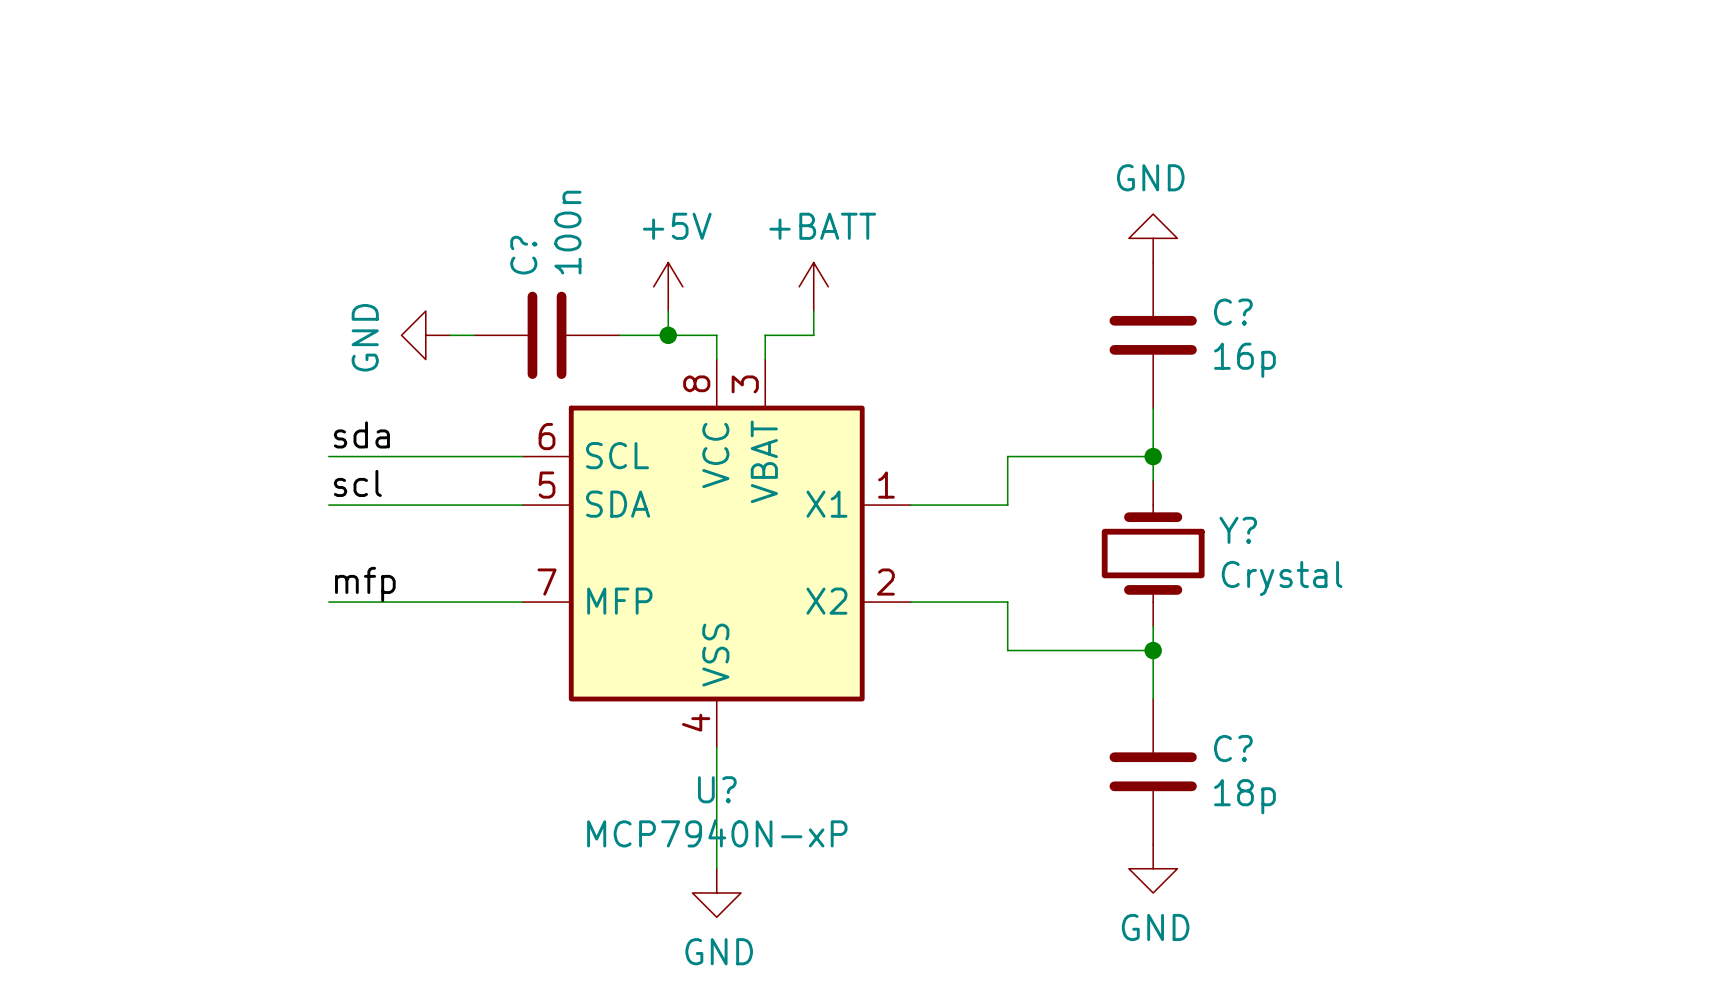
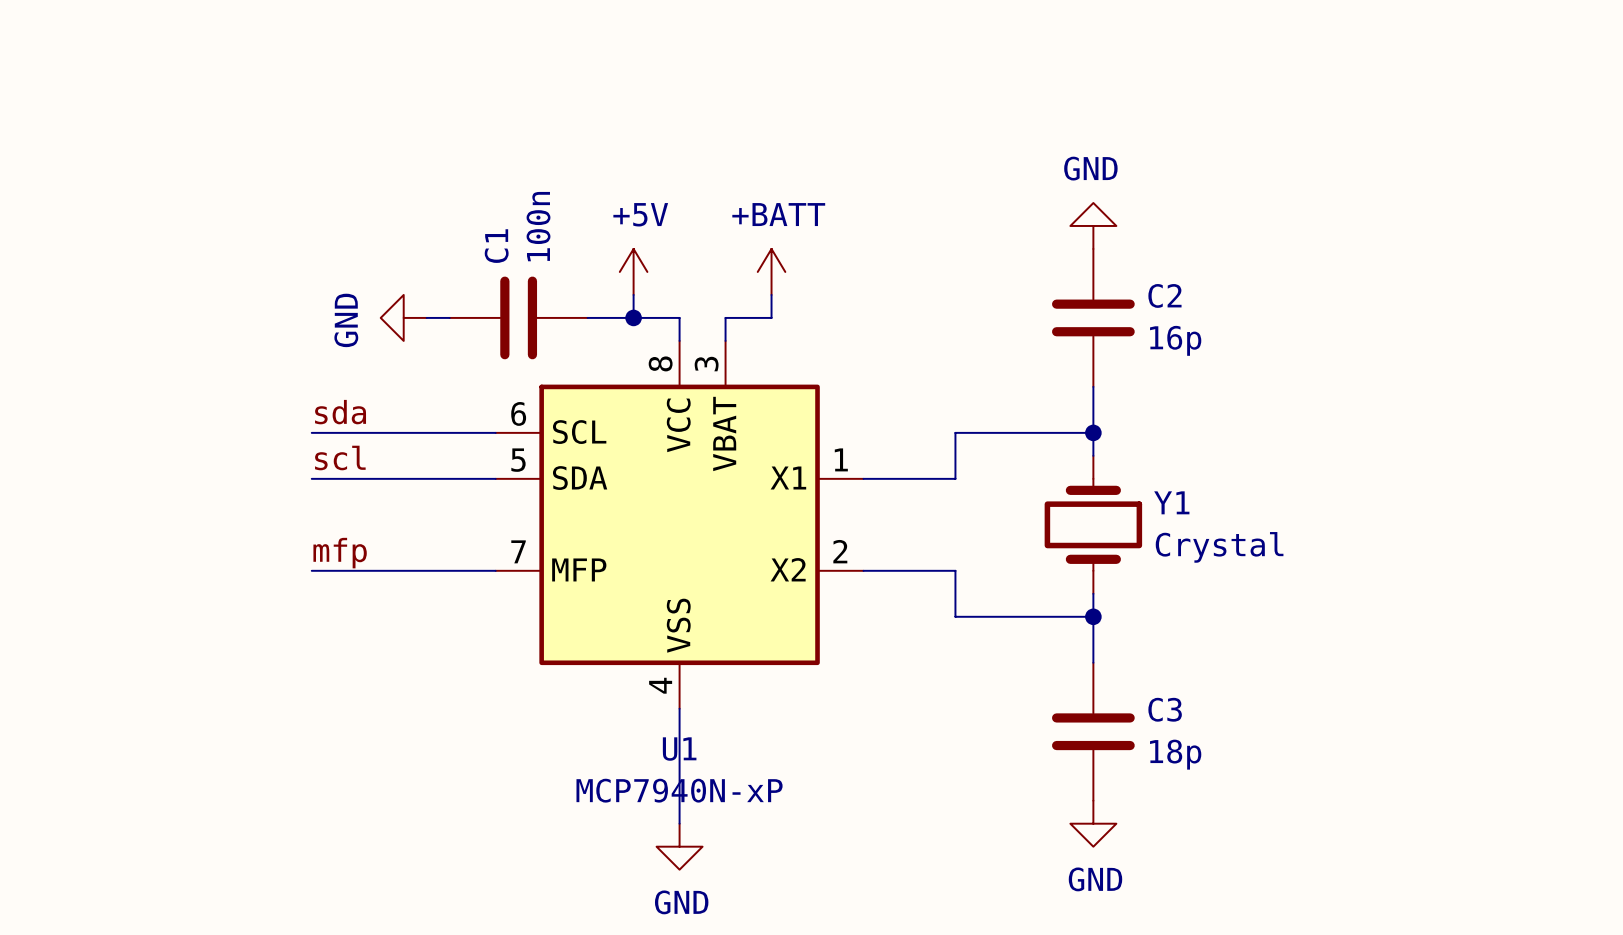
C? name: C? (523, 255) -> C1 (496, 246)
C? name: C? (1233, 312) -> C2 (1164, 295)
Y? name: Y? (1238, 530) -> Y1 (1171, 502)
C? name: C? (1233, 748) -> C3 (1165, 709)
U? name: U? (717, 789) -> U1 (679, 749)

